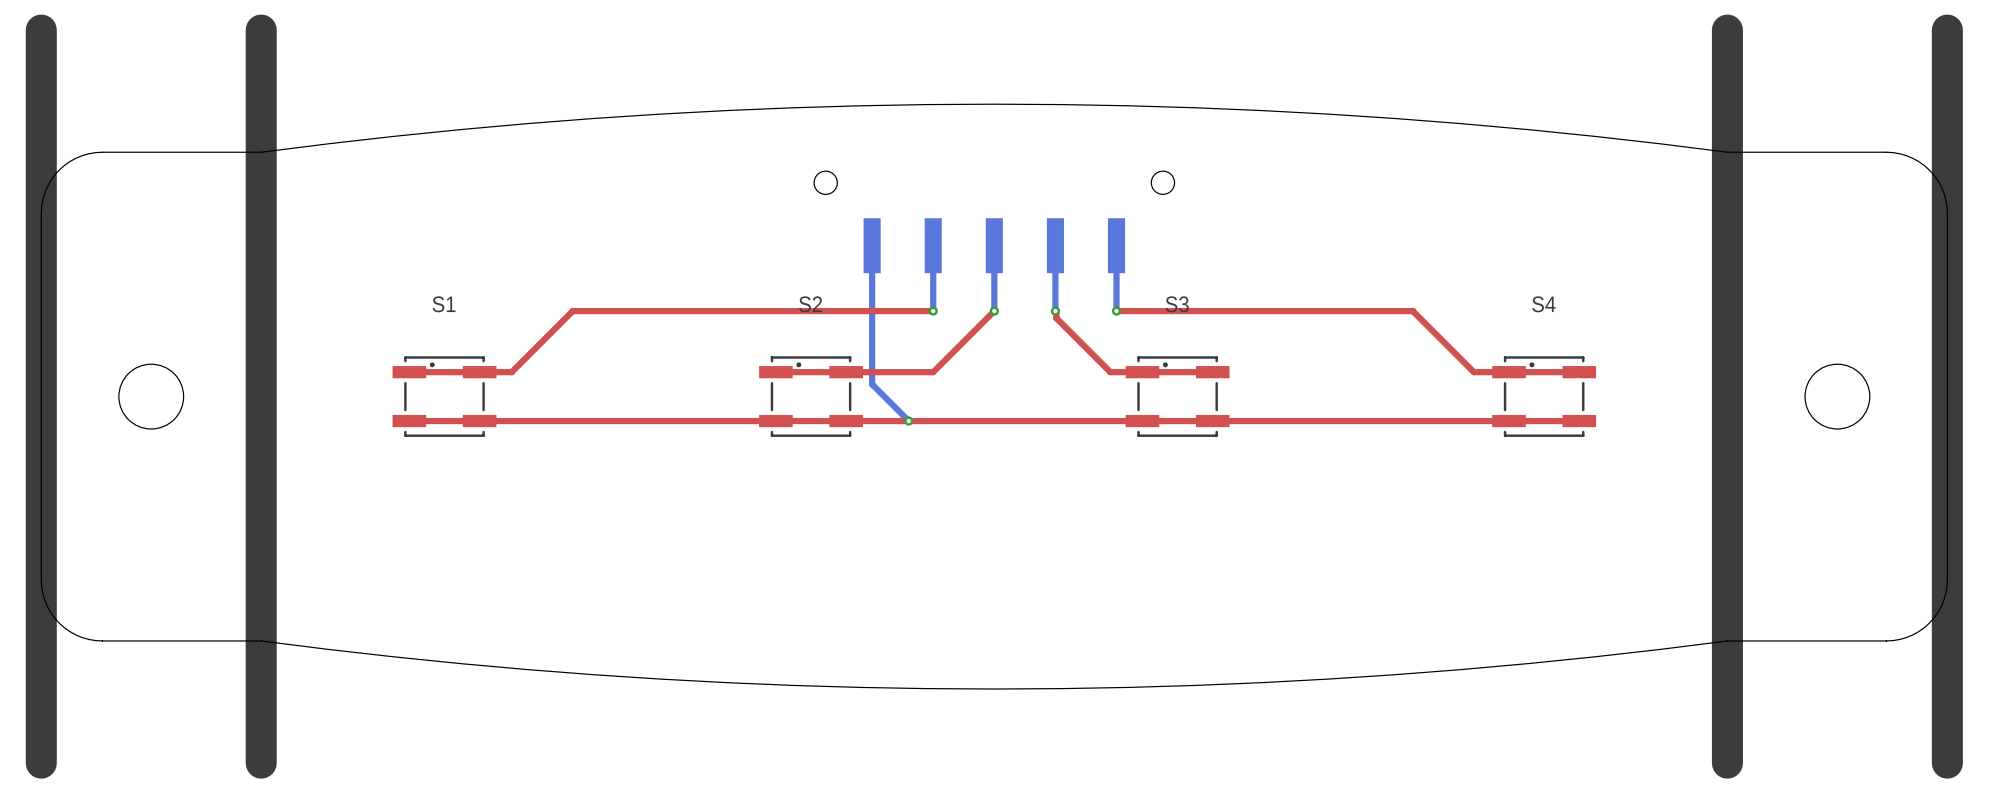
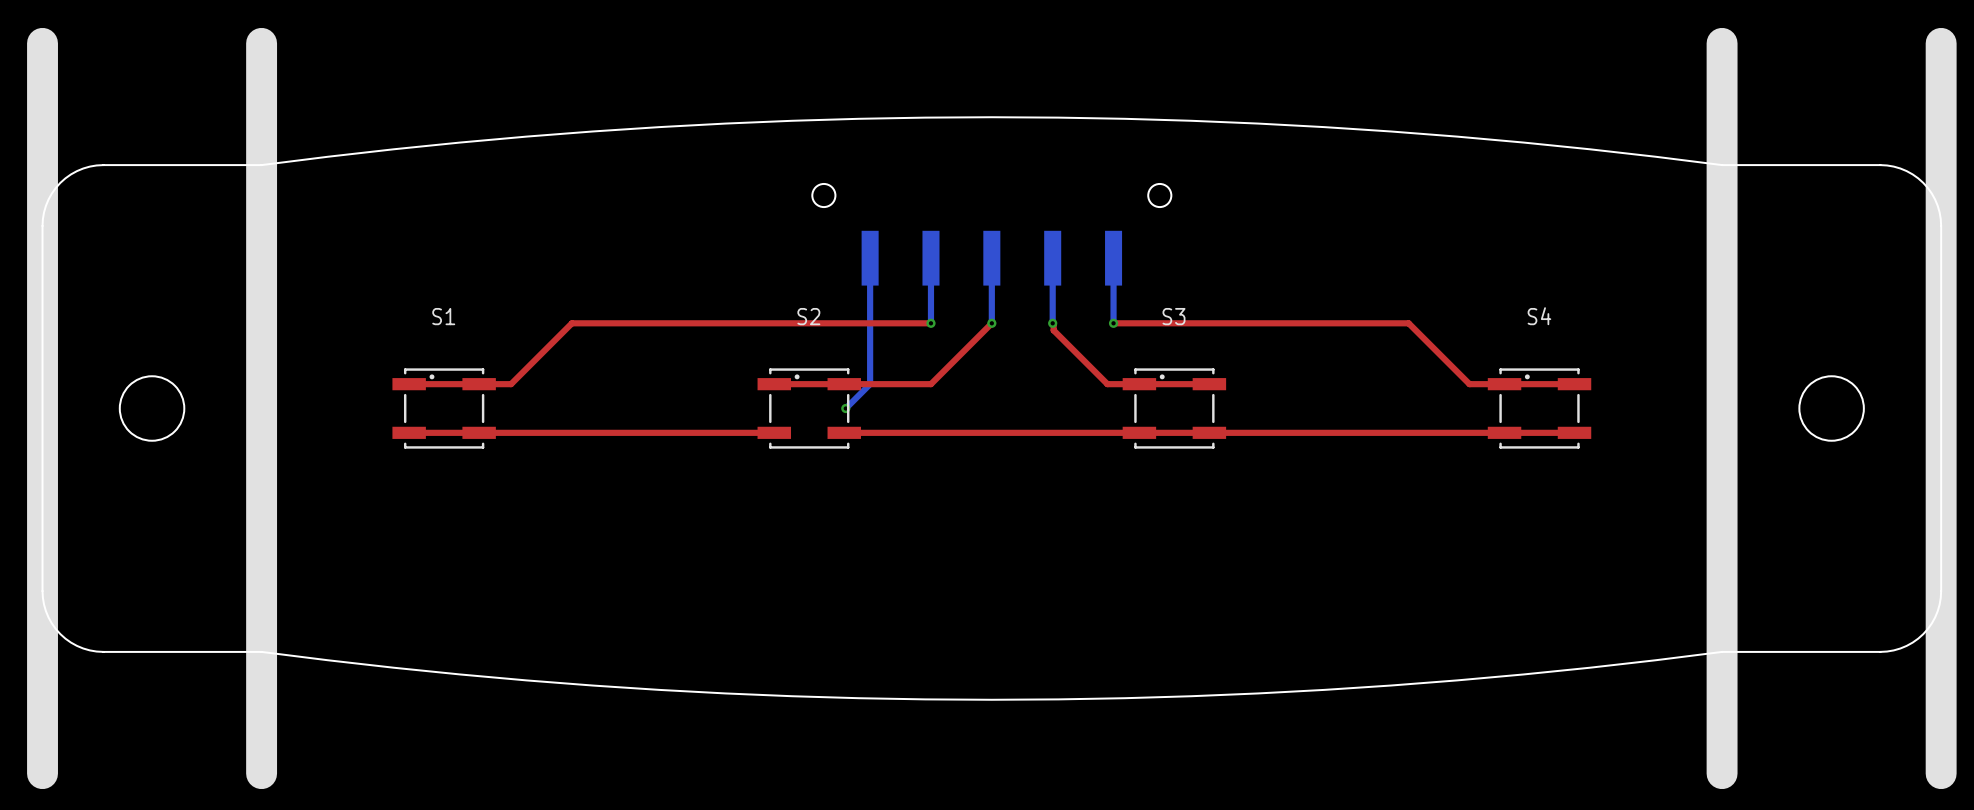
bottom track: (872, 372) (872, 384) (908, 421) -> (870, 384) (845, 408)
top track: (775, 421) (846, 421) -> none
via position: (908, 421) -> (845, 408)

